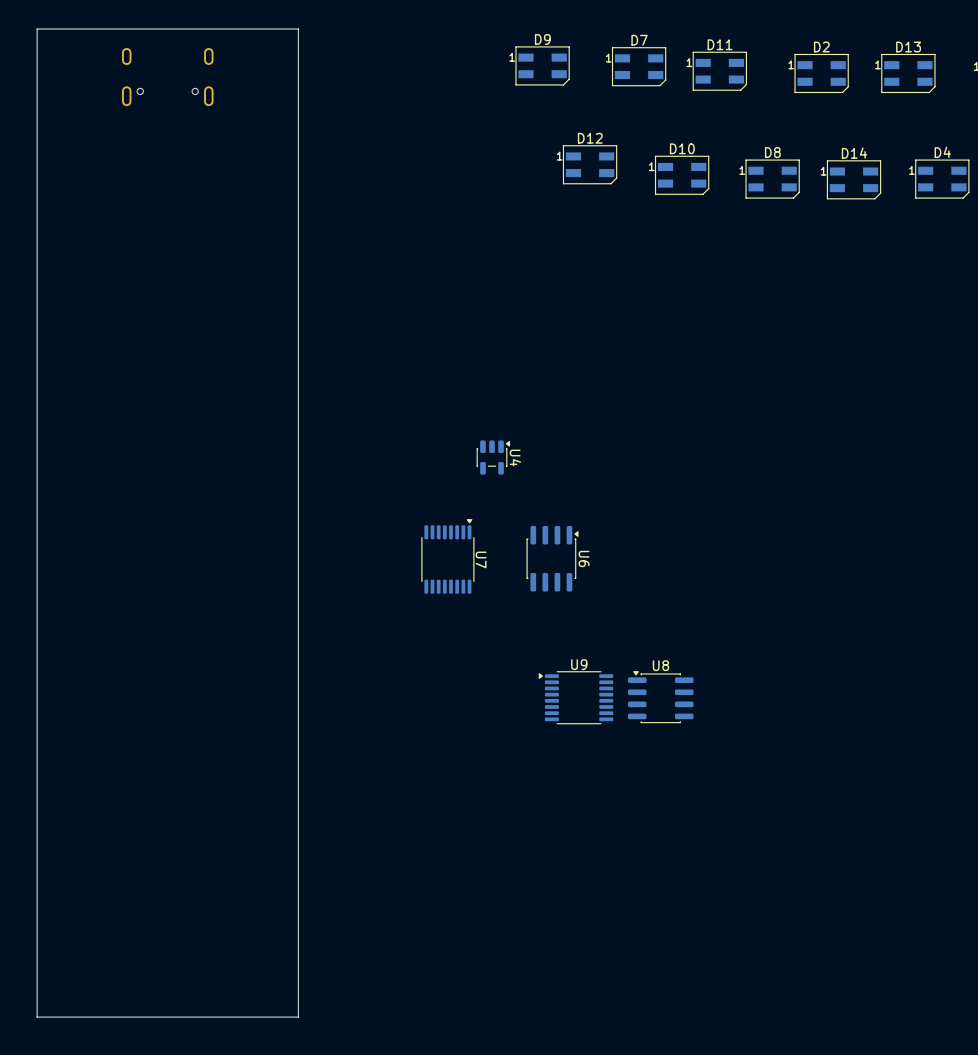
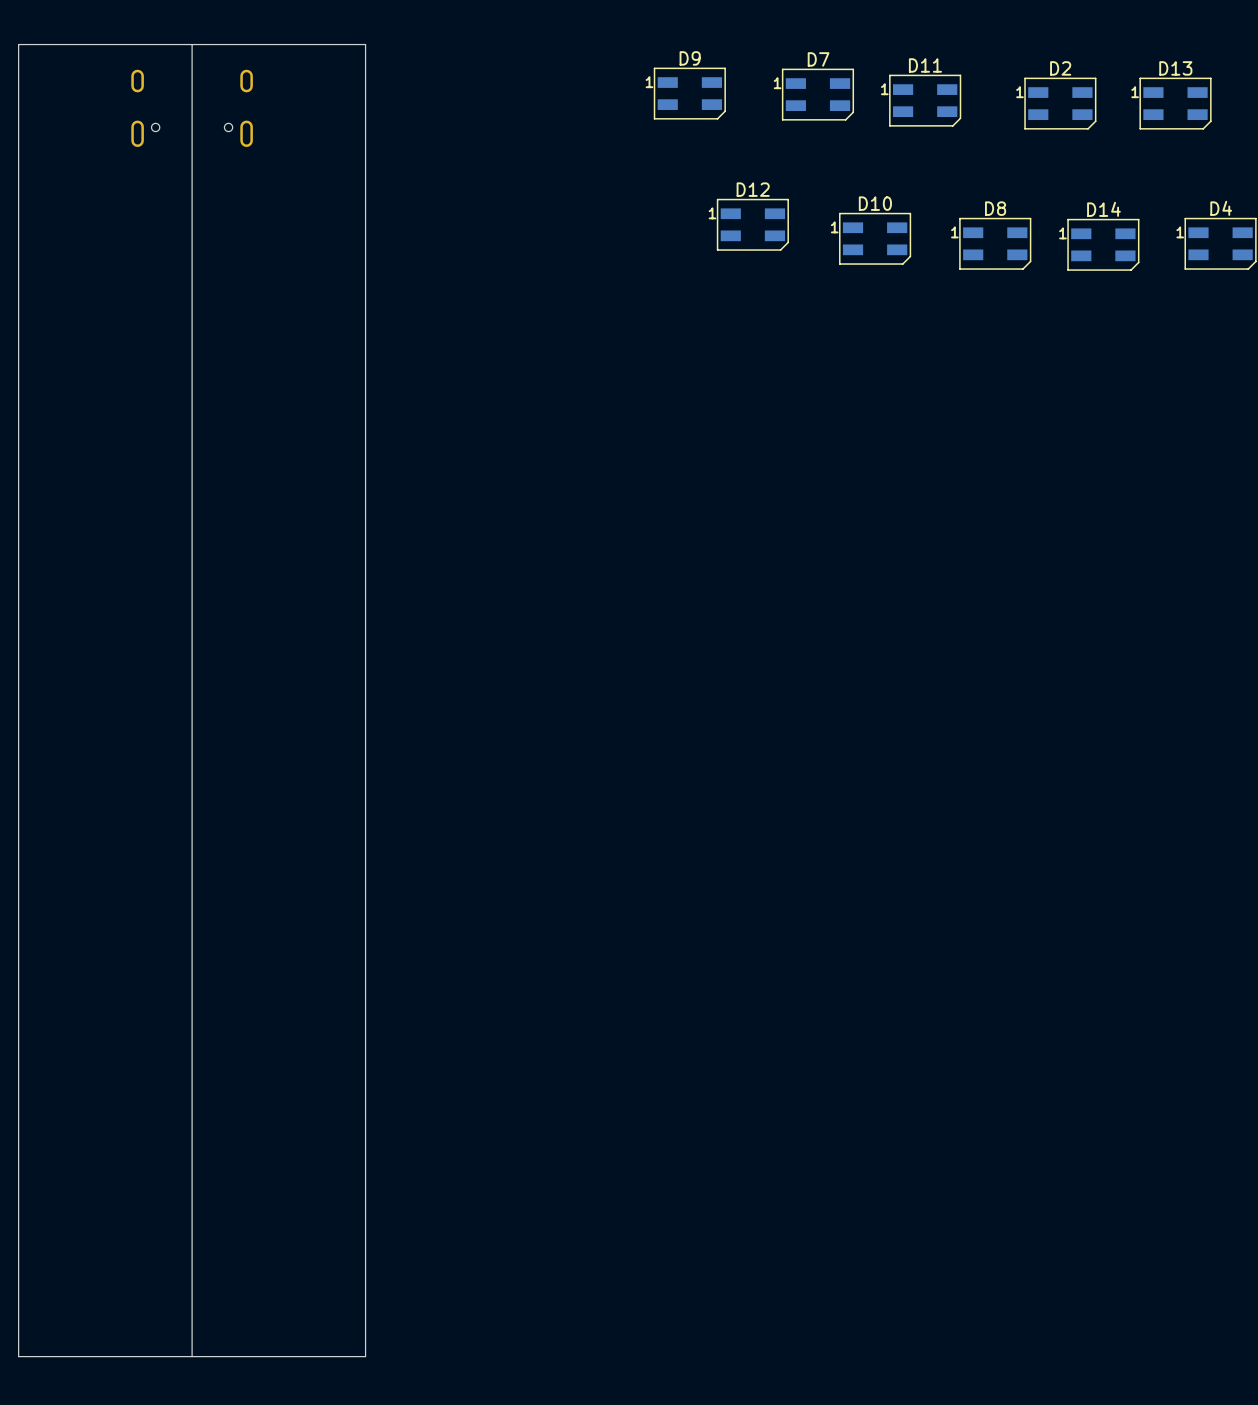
board edge: none -> (192, 44) (192, 1356)
U4: (493, 457) -> none
U7: (447, 556) -> none
U6: (552, 558) -> none
U9: (575, 697) -> none
U8: (660, 697) -> none

